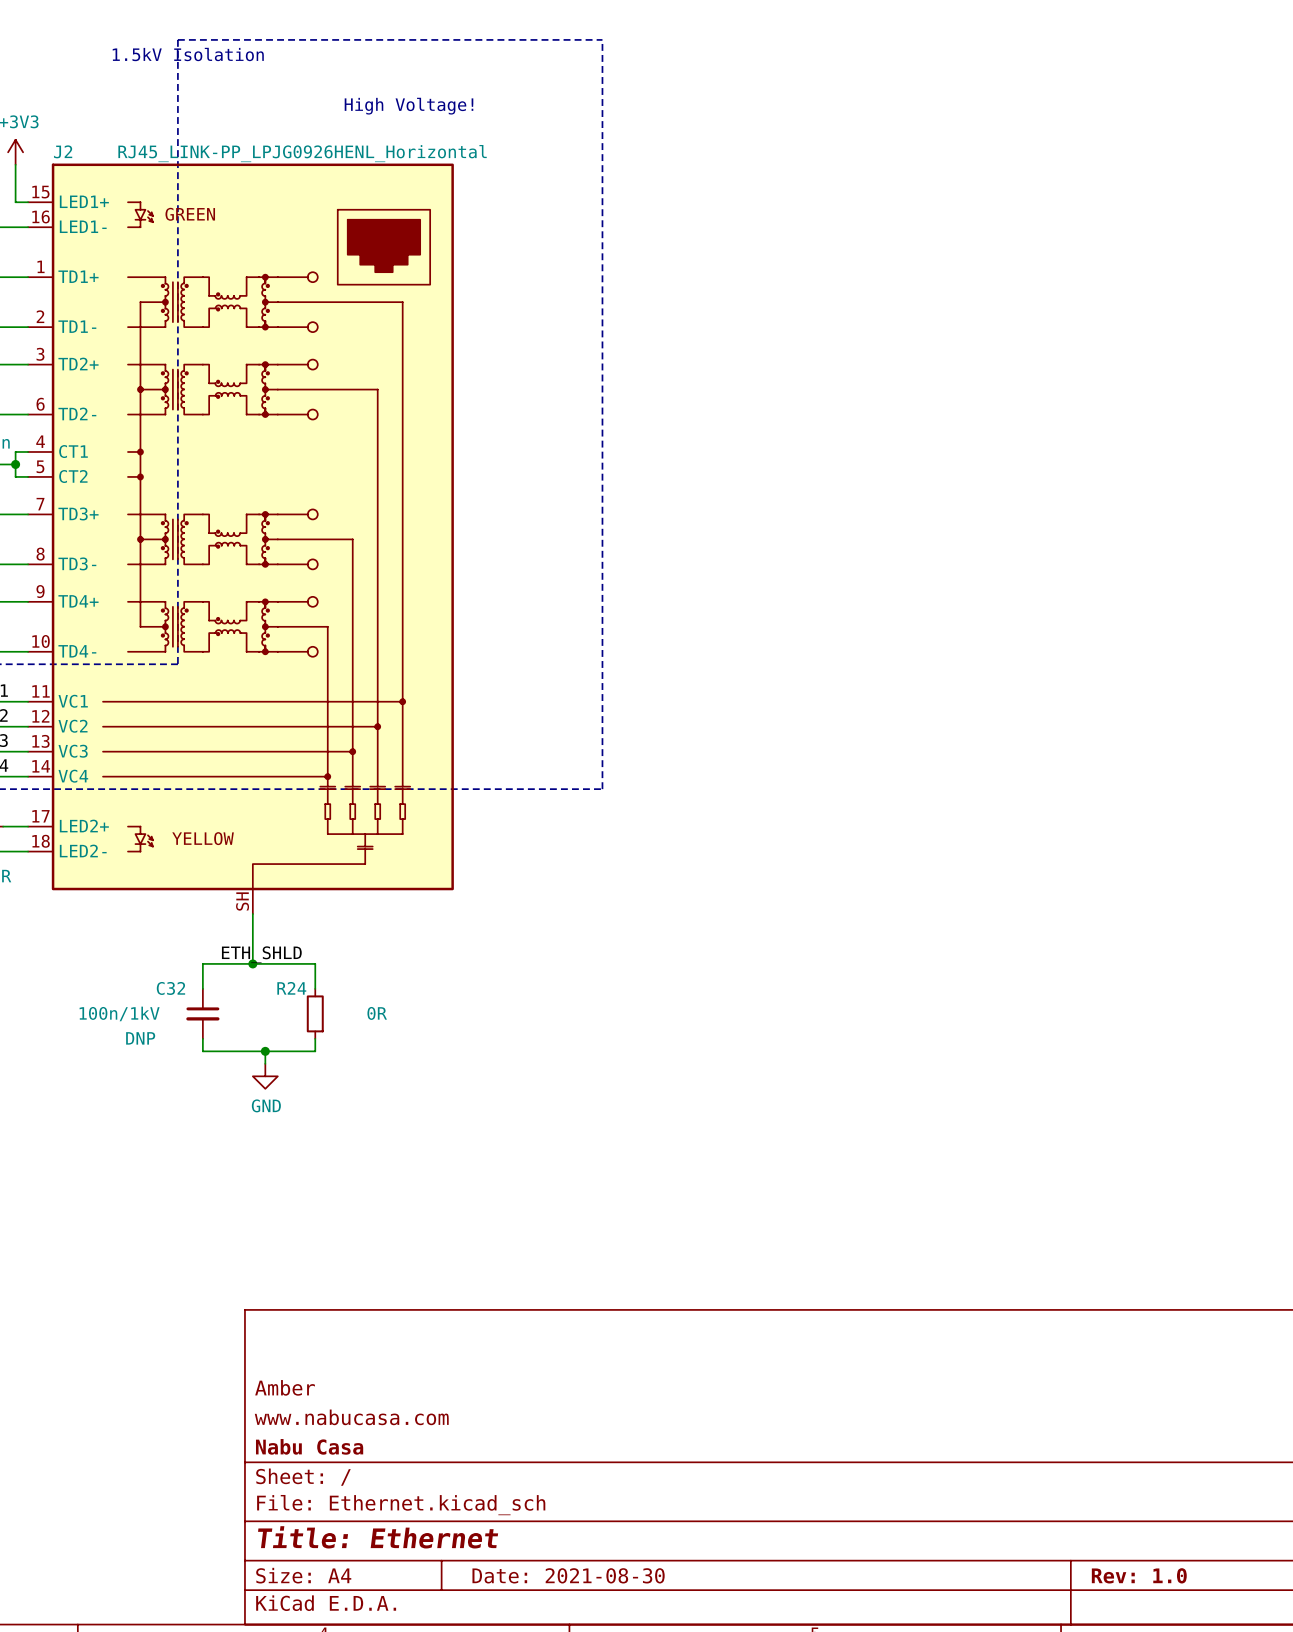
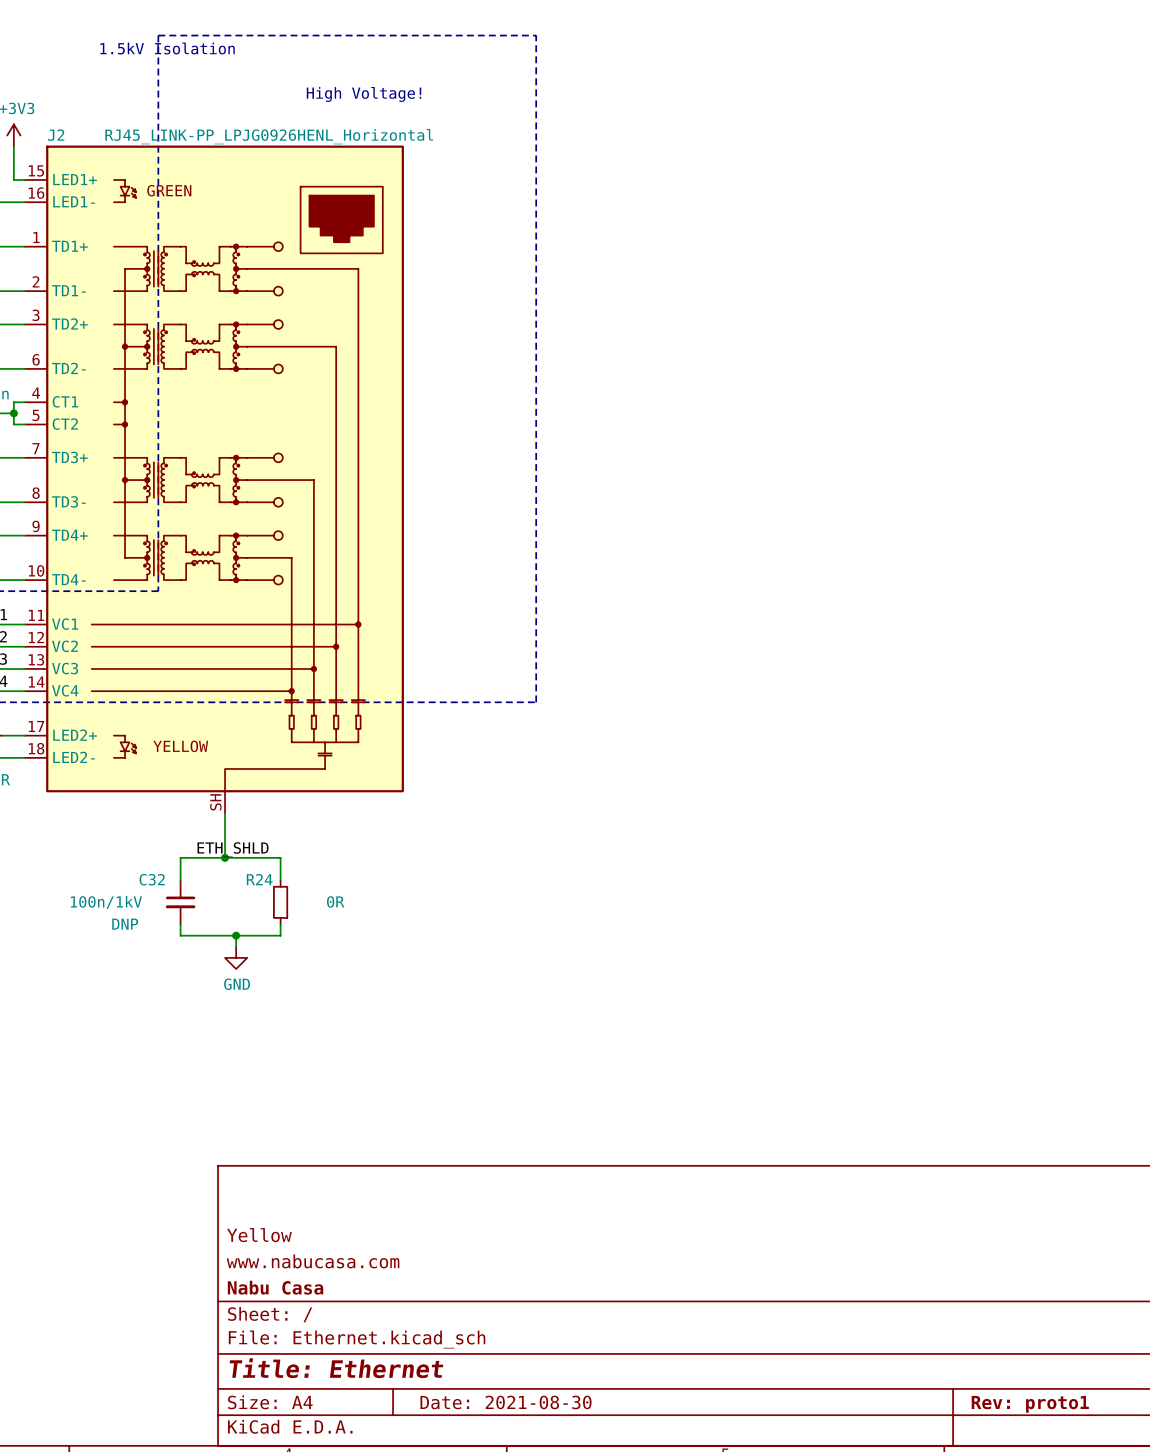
title block: Amber (285, 1387) -> Yellow (259, 1235)
title block: Rev: 1.0 (1139, 1575) -> Rev: proto1 (1030, 1404)

